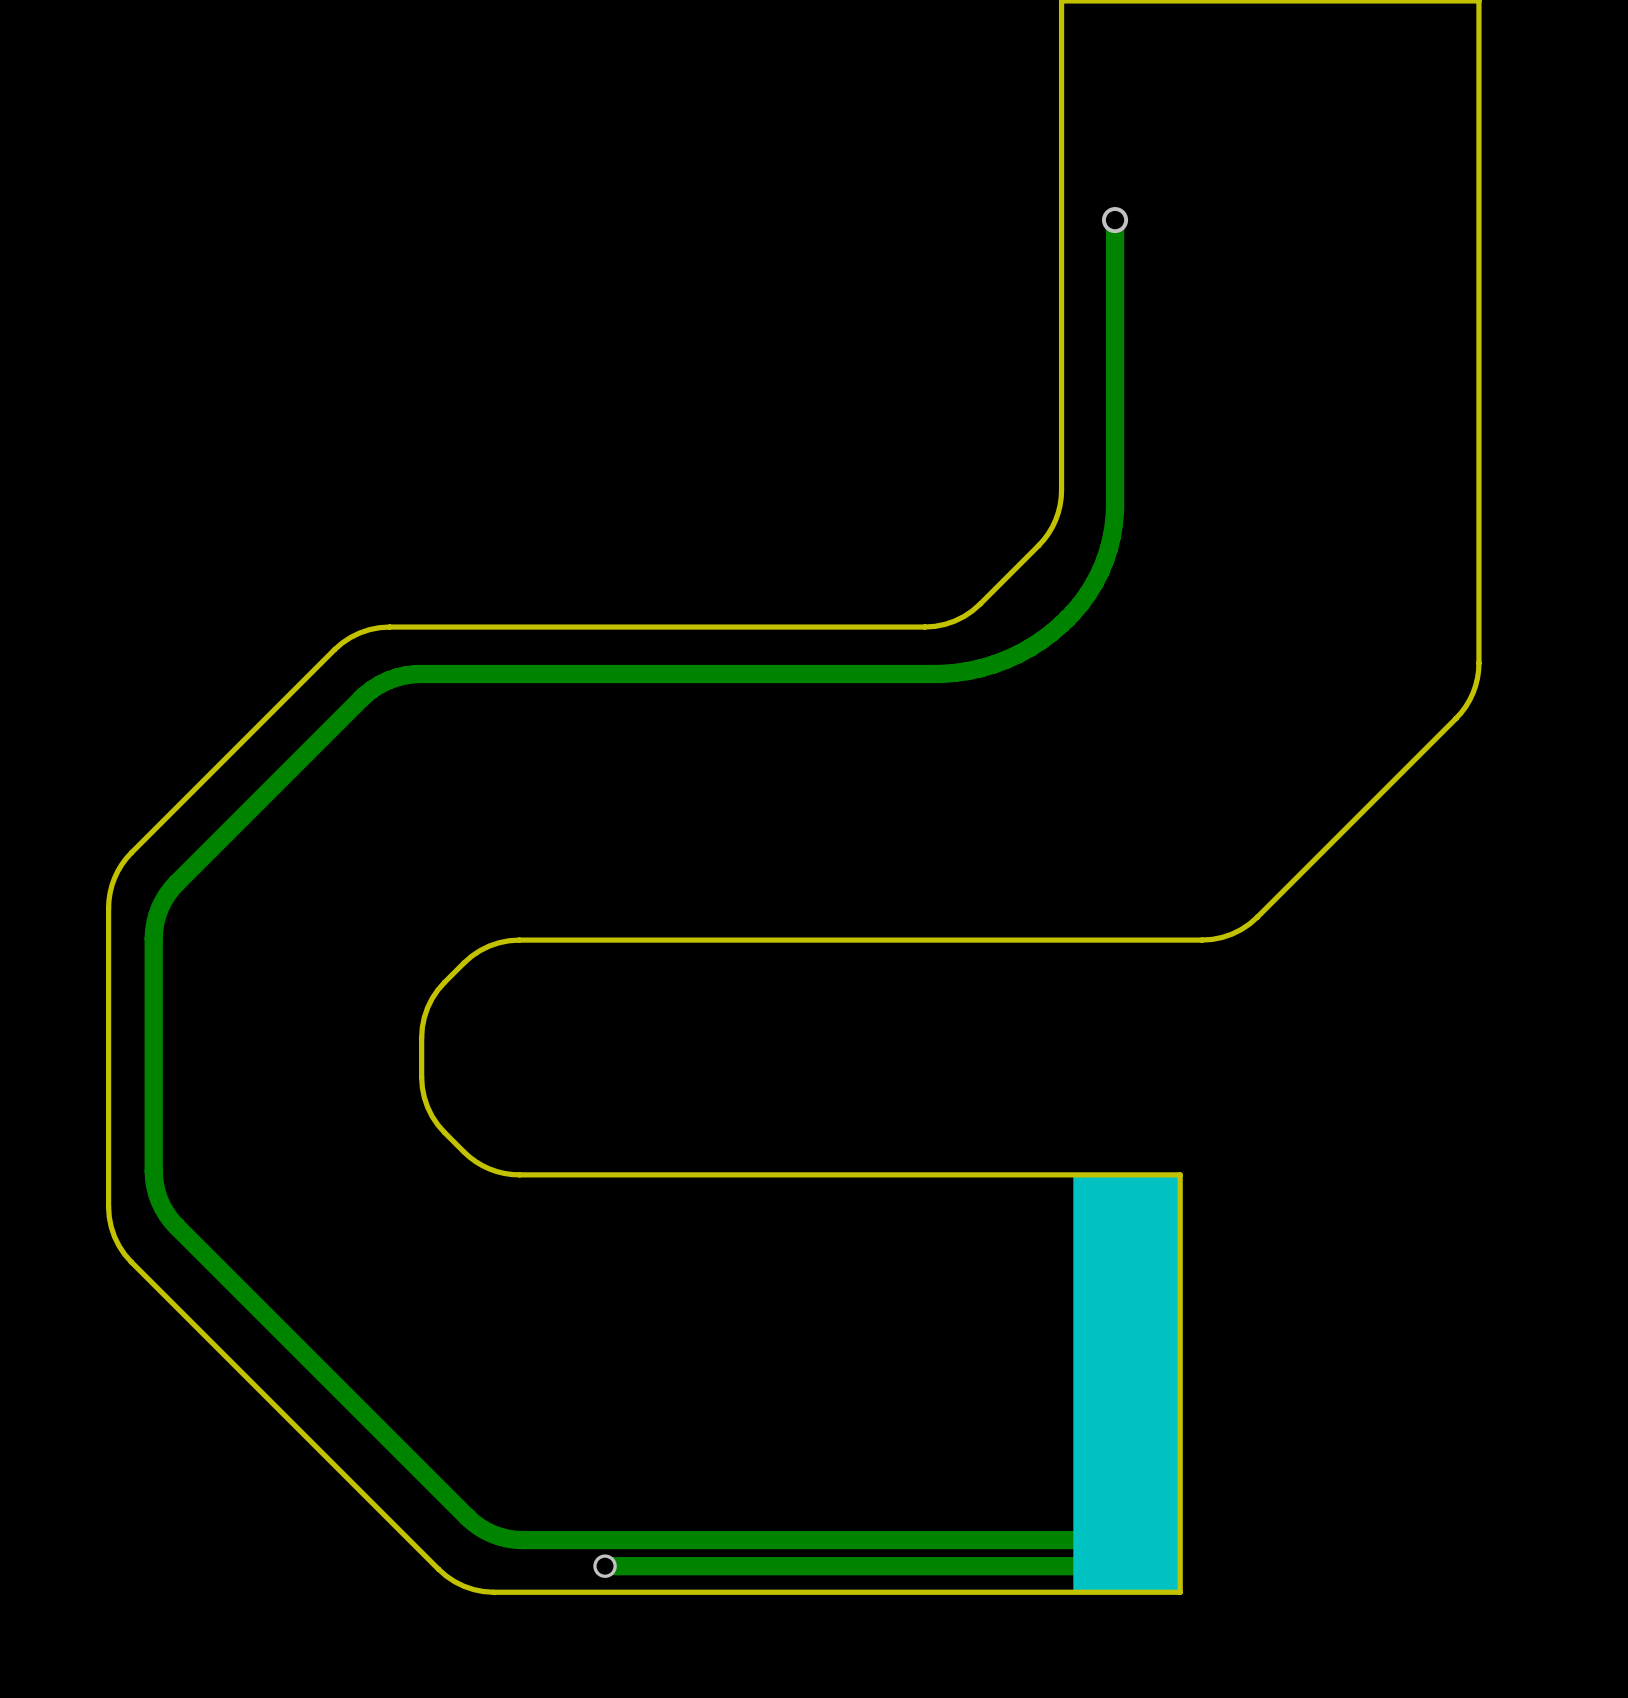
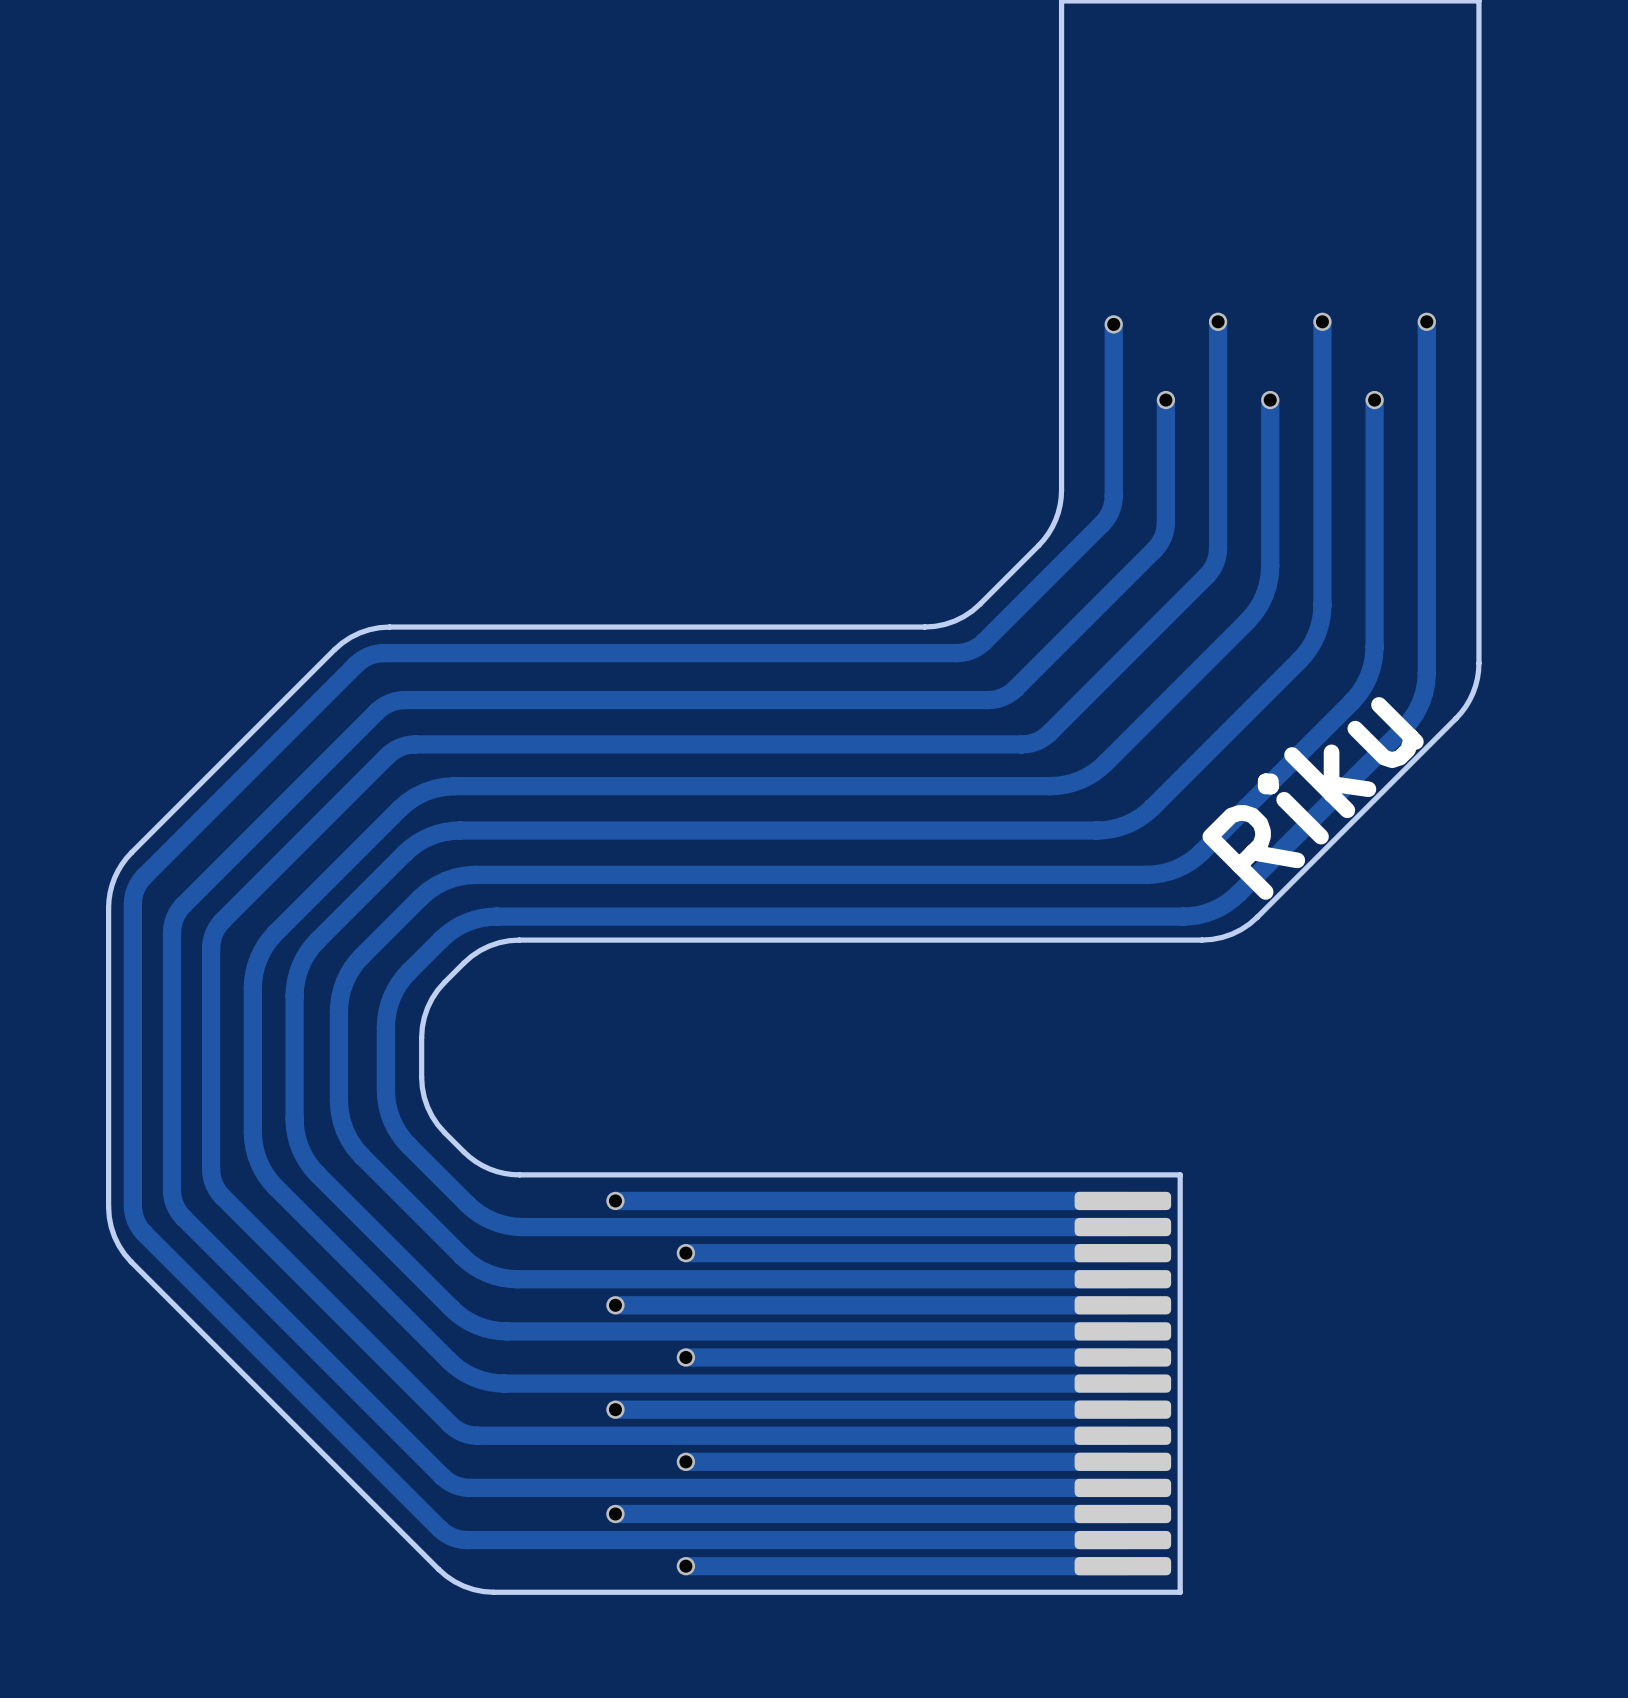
track: (1115, 220) (1114, 510) (1112, 535) (1100, 571) (1088, 593) (1068, 617) (1041, 640) (1018, 654) (993, 664) (967, 671) (941, 673) (420, 673) (397, 677) (379, 684) (364, 695) (176, 883) (166, 895) (159, 908) (155, 923) (153, 938) (153, 1171) (157, 1193) (162, 1208) (176, 1226) (467, 1517) (479, 1526) (492, 1534) (507, 1538) (522, 1540) -> (1113, 324) (1113, 496) (1110, 511) (1102, 523) (976, 647) (956, 653) (373, 654) (356, 664) (144, 876) (135, 889) (132, 904) (132, 1205) (138, 1225) (443, 1532) (462, 1539) (522, 1540)
via: (1115, 220) -> none
track: none -> (1218, 321) (1218, 548) (1215, 563) (1206, 575) (1041, 739) (1021, 744) (405, 745) (387, 755) (222, 920) (216, 928) (211, 943) (211, 1169) (216, 1188) (458, 1430) (477, 1435) (1126, 1435)
via: none -> (1218, 321)
track: none -> (1322, 321) (1322, 605) (1320, 620) (1316, 635) (1309, 648) (1299, 660) (1140, 817) (1119, 827) (1096, 830) (444, 832) (430, 836) (410, 848) (317, 940) (303, 959) (296, 980) (294, 1118) (296, 1134) (303, 1155) (317, 1174) (451, 1308) (463, 1318) (477, 1325) (491, 1329) (507, 1331) (1126, 1331)
via: none -> (1322, 321)
track: none -> (1426, 321) (1426, 672) (1420, 702) (1403, 728) (1226, 903) (1205, 913) (1183, 916) (488, 916) (466, 922) (446, 934) (403, 977) (395, 990) (389, 1004) (385, 1027) (385, 1090) (387, 1105) (395, 1127) (408, 1145) (467, 1204) (479, 1213) (499, 1223) (522, 1227) (1126, 1227)
via: none -> (1426, 321)
via: none -> (1113, 324)
track: none -> (1165, 400) (1165, 522) (1160, 541) (1007, 694) (987, 700) (394, 701) (377, 711) (183, 905) (174, 917) (171, 932) (171, 1189) (177, 1209) (450, 1482) (469, 1487) (1126, 1487)
via: none -> (1165, 400)
track: none -> (1270, 400) (1270, 565) (1264, 595) (1247, 621) (1105, 763) (1086, 776) (1065, 784) (1050, 786) (454, 786) (434, 788) (415, 796) (399, 809) (275, 932) (266, 944) (258, 958) (253, 980) (252, 1132) (256, 1154) (262, 1168) (275, 1187) (449, 1360) (460, 1370) (474, 1377) (489, 1382) (504, 1383) (1126, 1383)
via: none -> (1270, 400)
track: none -> (1374, 400) (1374, 646) (1368, 676) (1351, 702) (1201, 851) (1183, 865) (1161, 873) (1146, 874) (465, 875) (436, 885) (420, 897) (356, 961) (348, 974) (342, 988) (338, 1011) (338, 1100) (341, 1120) (349, 1139) (361, 1156) (462, 1256) (473, 1266) (487, 1273) (502, 1277) (517, 1279) (1126, 1279)
via: none -> (1374, 400)
text: none -> Riku (1313, 798)
via: none -> (615, 1200)
track: none -> (1126, 1200) (615, 1200)
via: none -> (685, 1253)
track: none -> (1126, 1253) (685, 1253)
via: none -> (615, 1305)
track: none -> (1126, 1305) (615, 1305)
via: none -> (685, 1357)
track: none -> (1126, 1357) (685, 1357)
part: none -> (1122, 1383)
part: (1126, 1383) -> none
via: none -> (615, 1409)
track: none -> (1126, 1409) (615, 1409)
via: none -> (685, 1461)
track: none -> (1126, 1461) (685, 1461)
via: none -> (615, 1514)
track: none -> (1126, 1514) (615, 1514)
via: (605, 1566) -> none
track: (685, 1566) (605, 1566) -> none
via: none -> (685, 1566)

